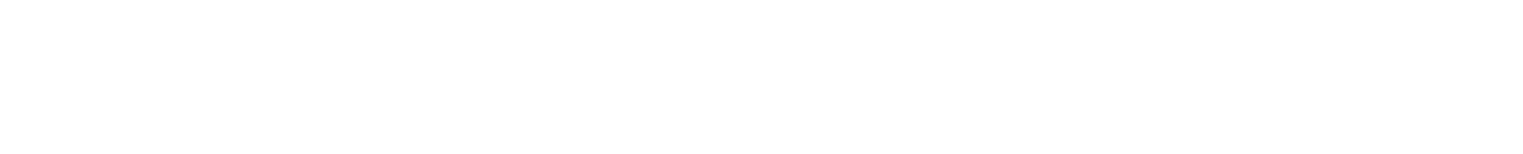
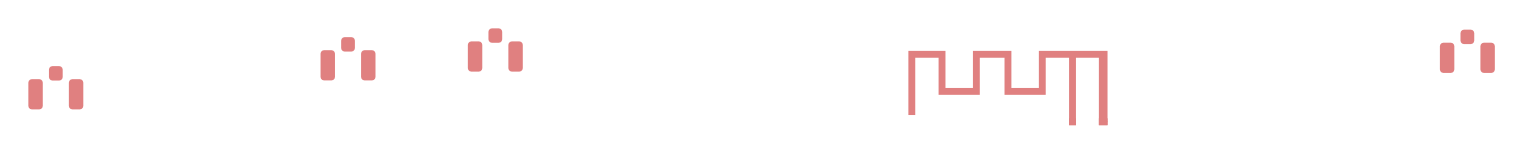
part: none -> (495, 49)
part: none -> (1467, 51)
part: none -> (348, 58)
part: none -> (55, 87)
part: none -> (1007, 88)

